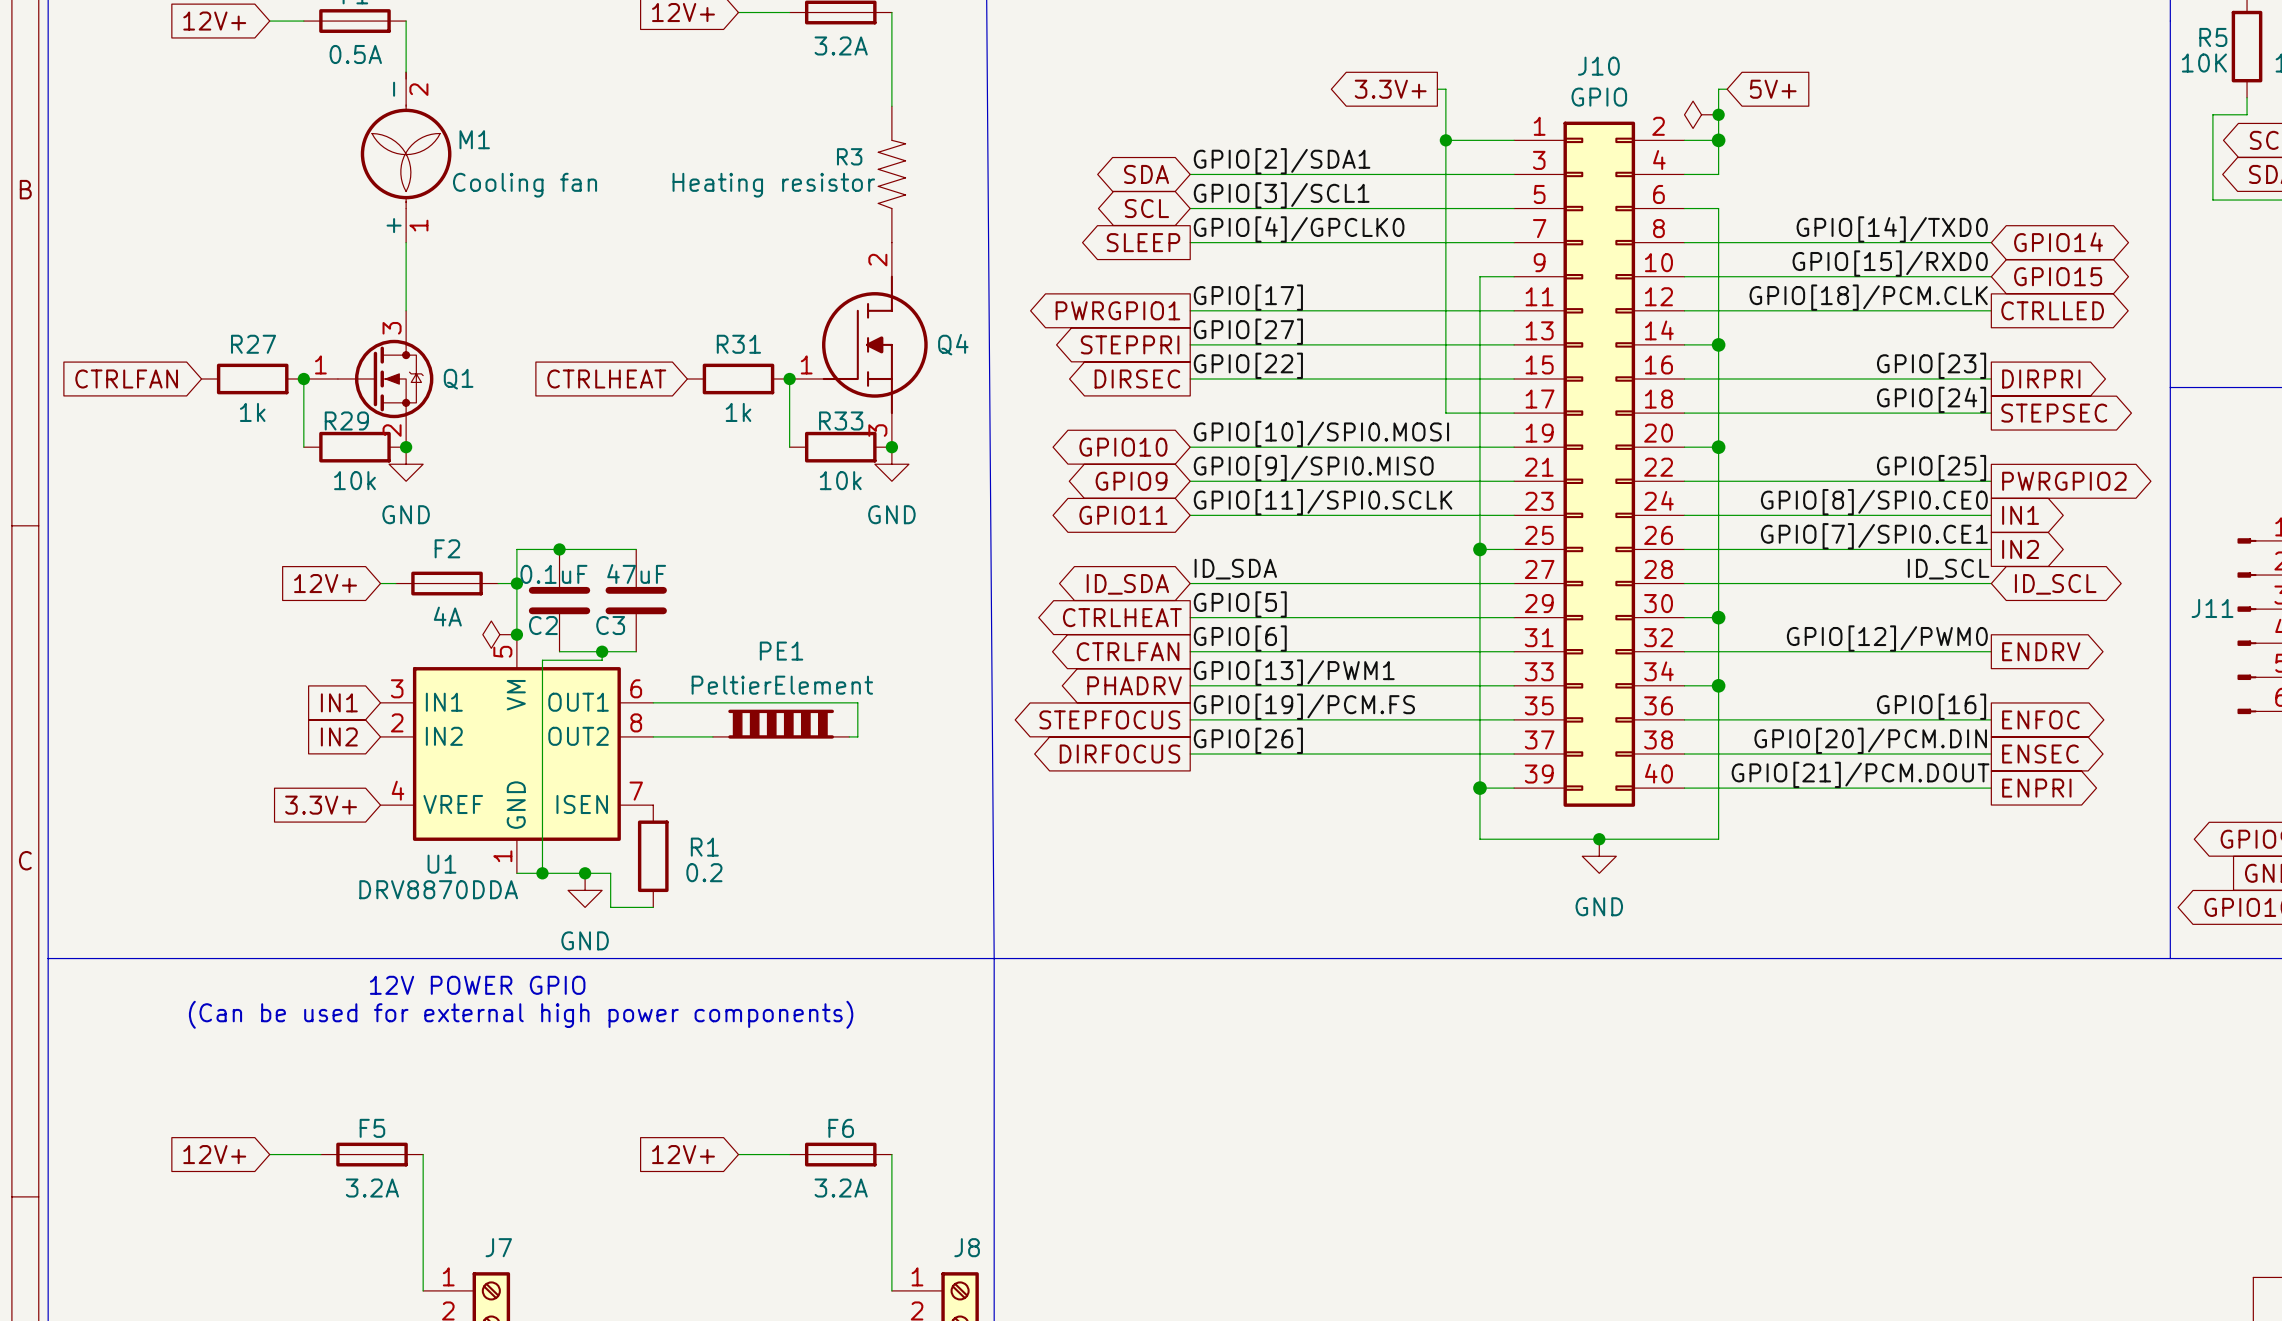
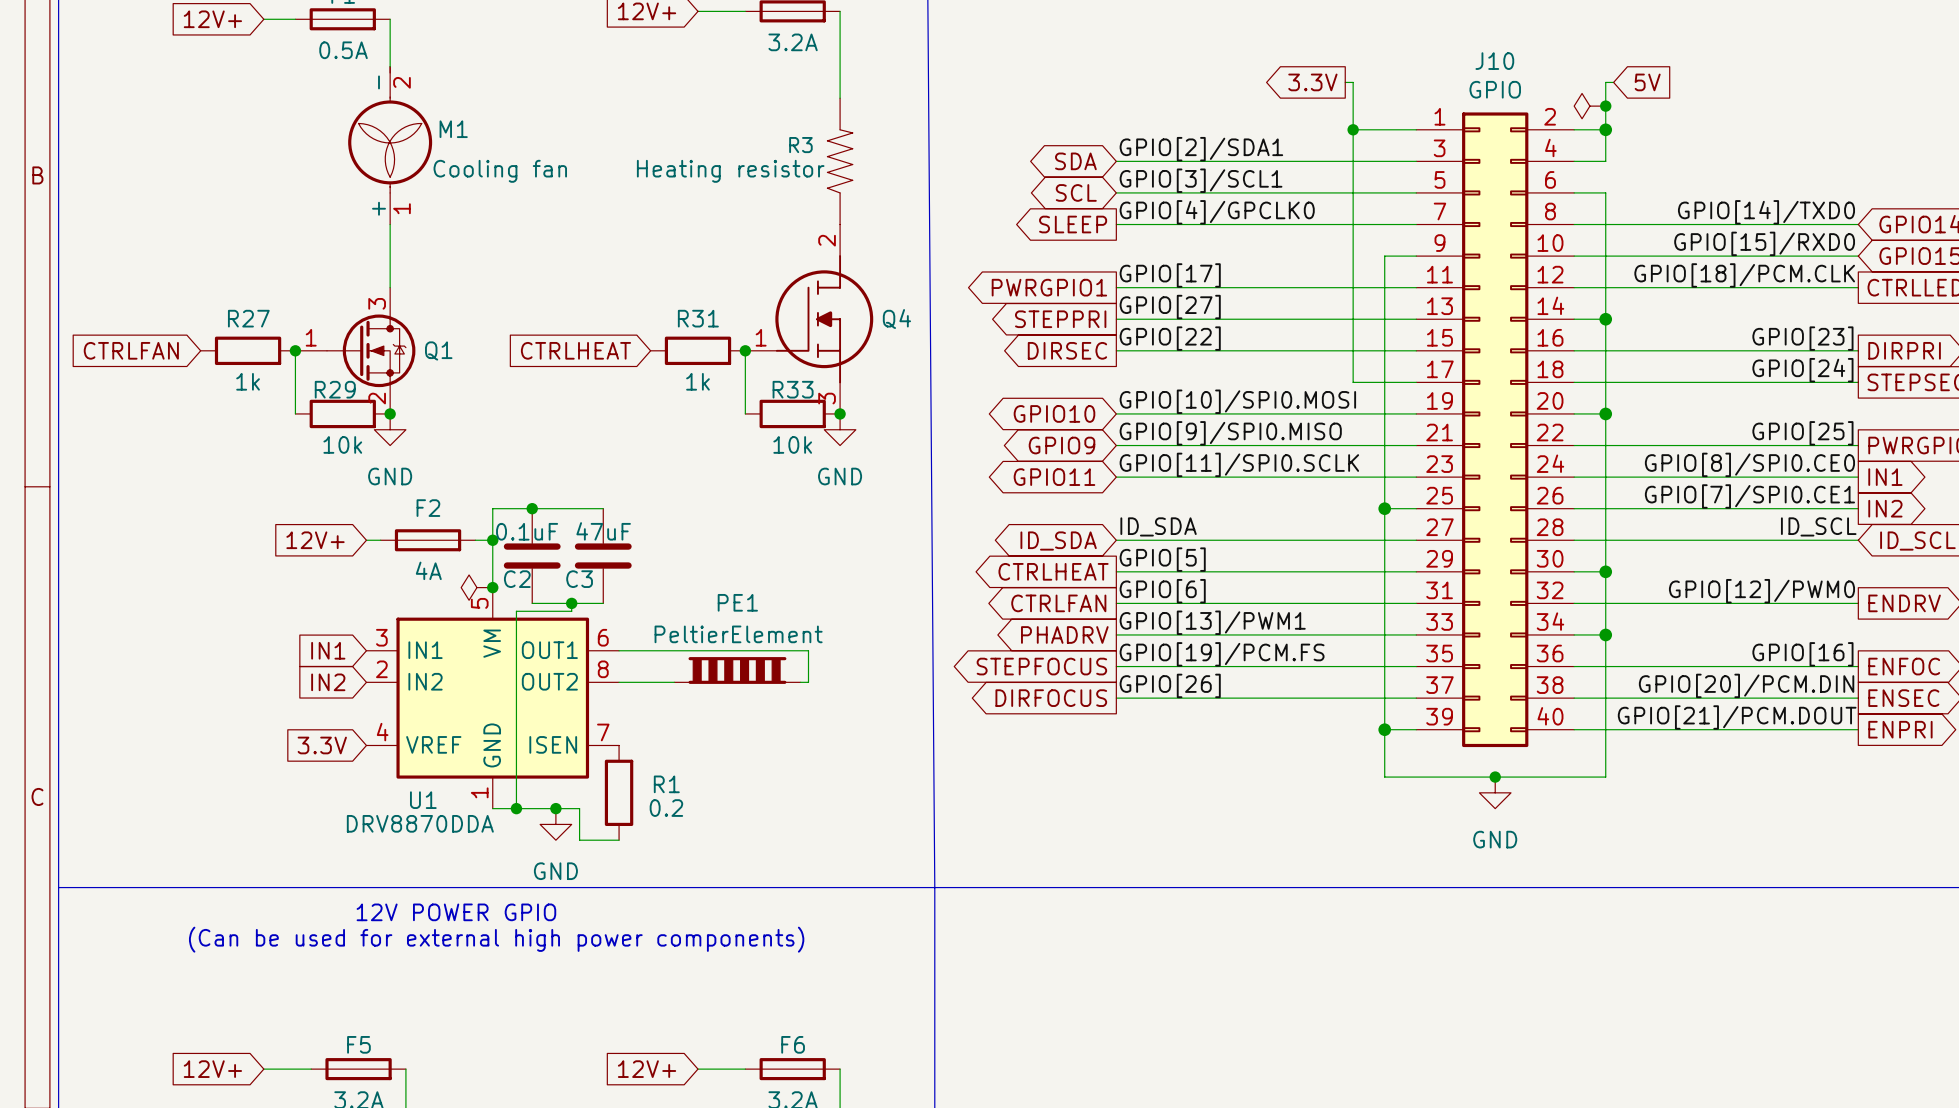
global label: 3.3V+ (1390, 89) -> 3.3V (1312, 82)
global label: 5V+ (1773, 89) -> 5V (1647, 82)
global label: 3.3V+ (321, 805) -> 3.3V (322, 745)

